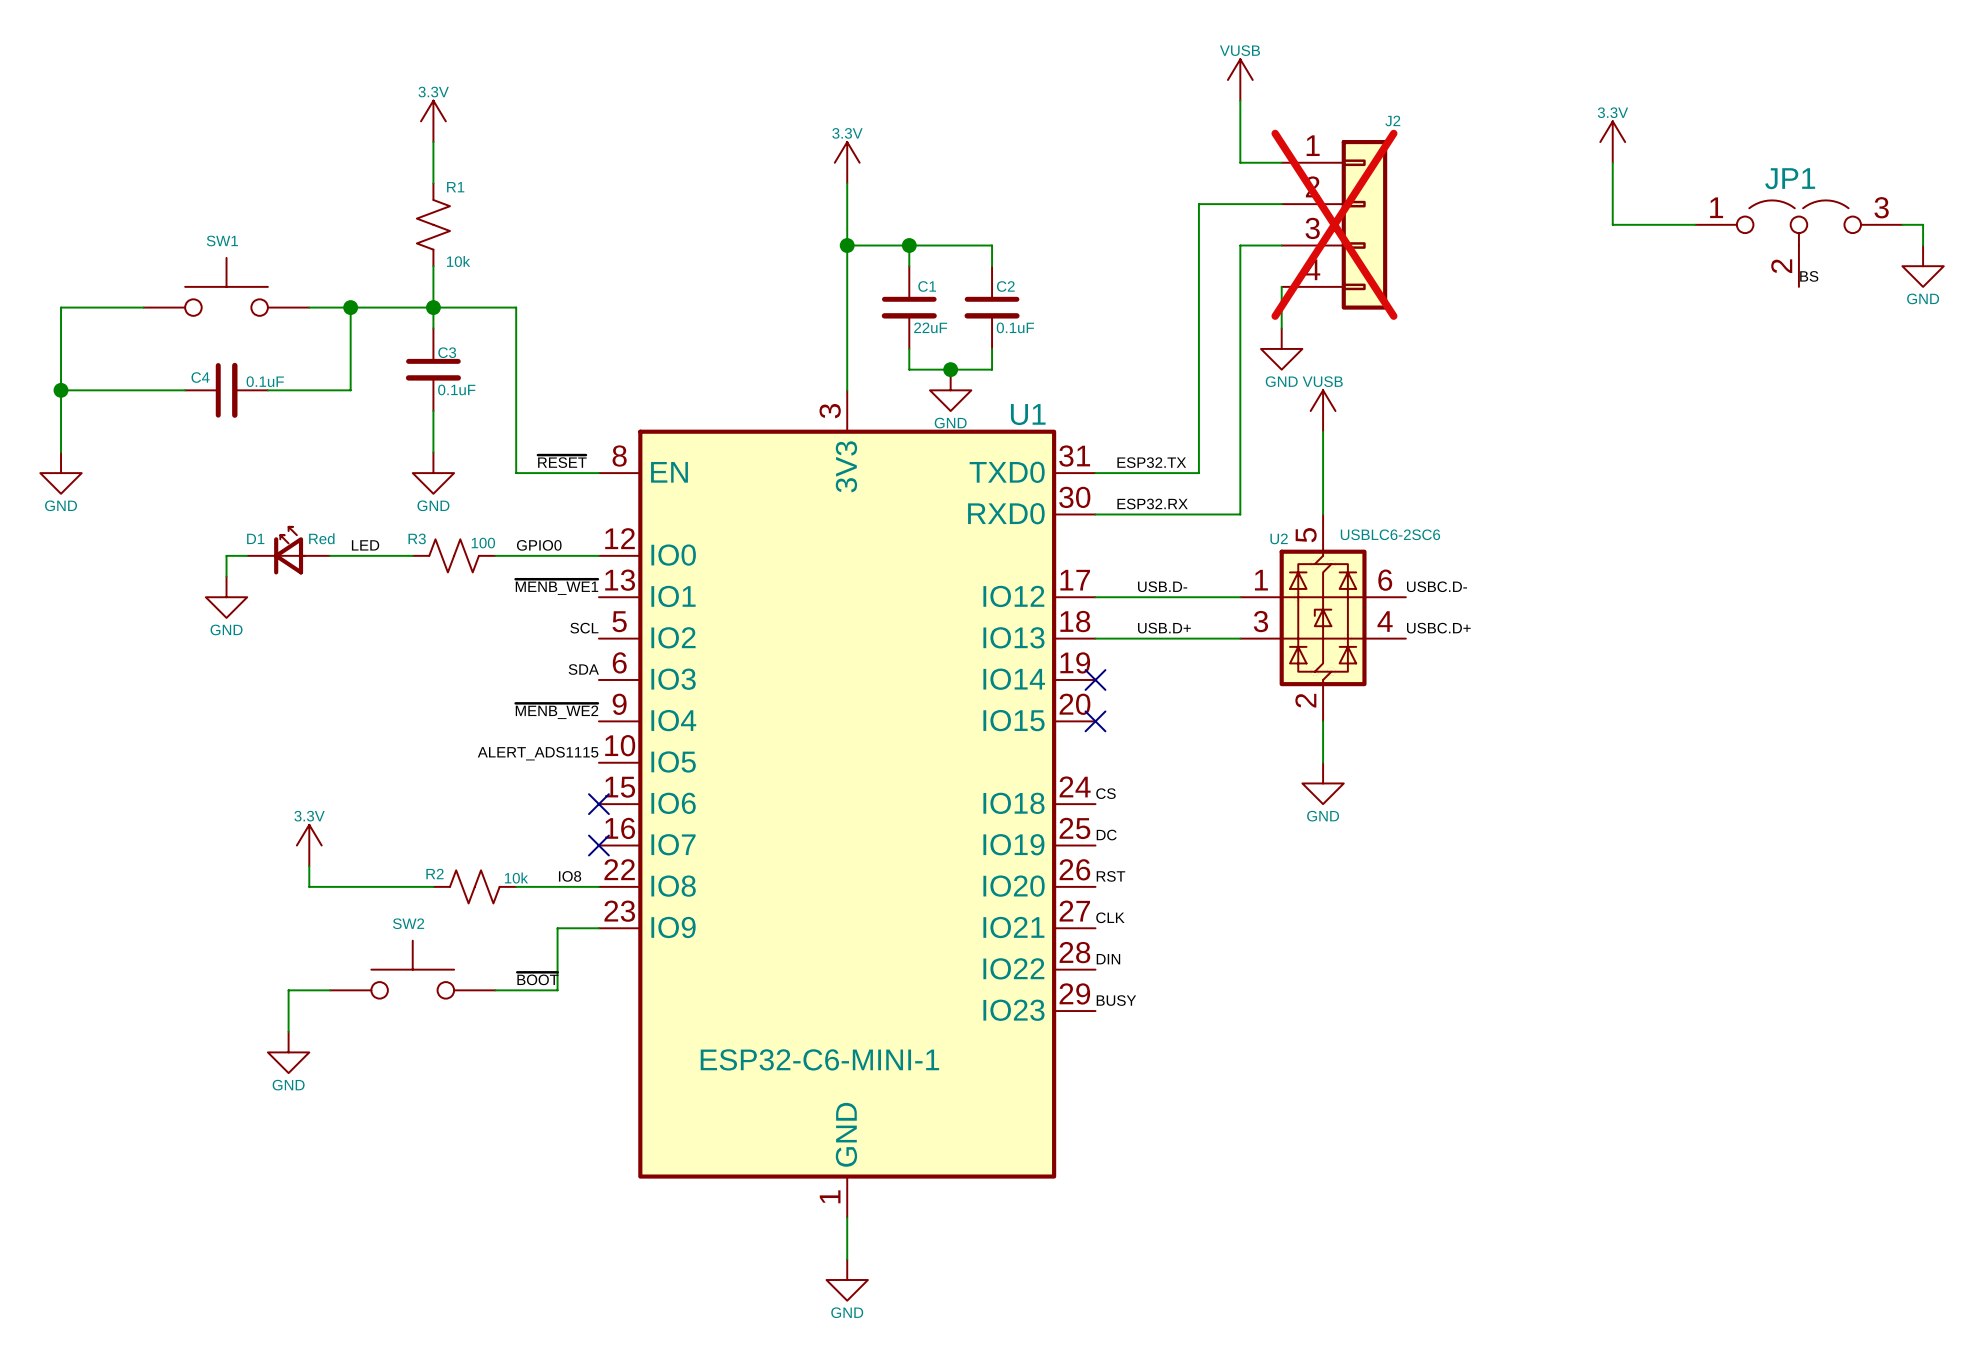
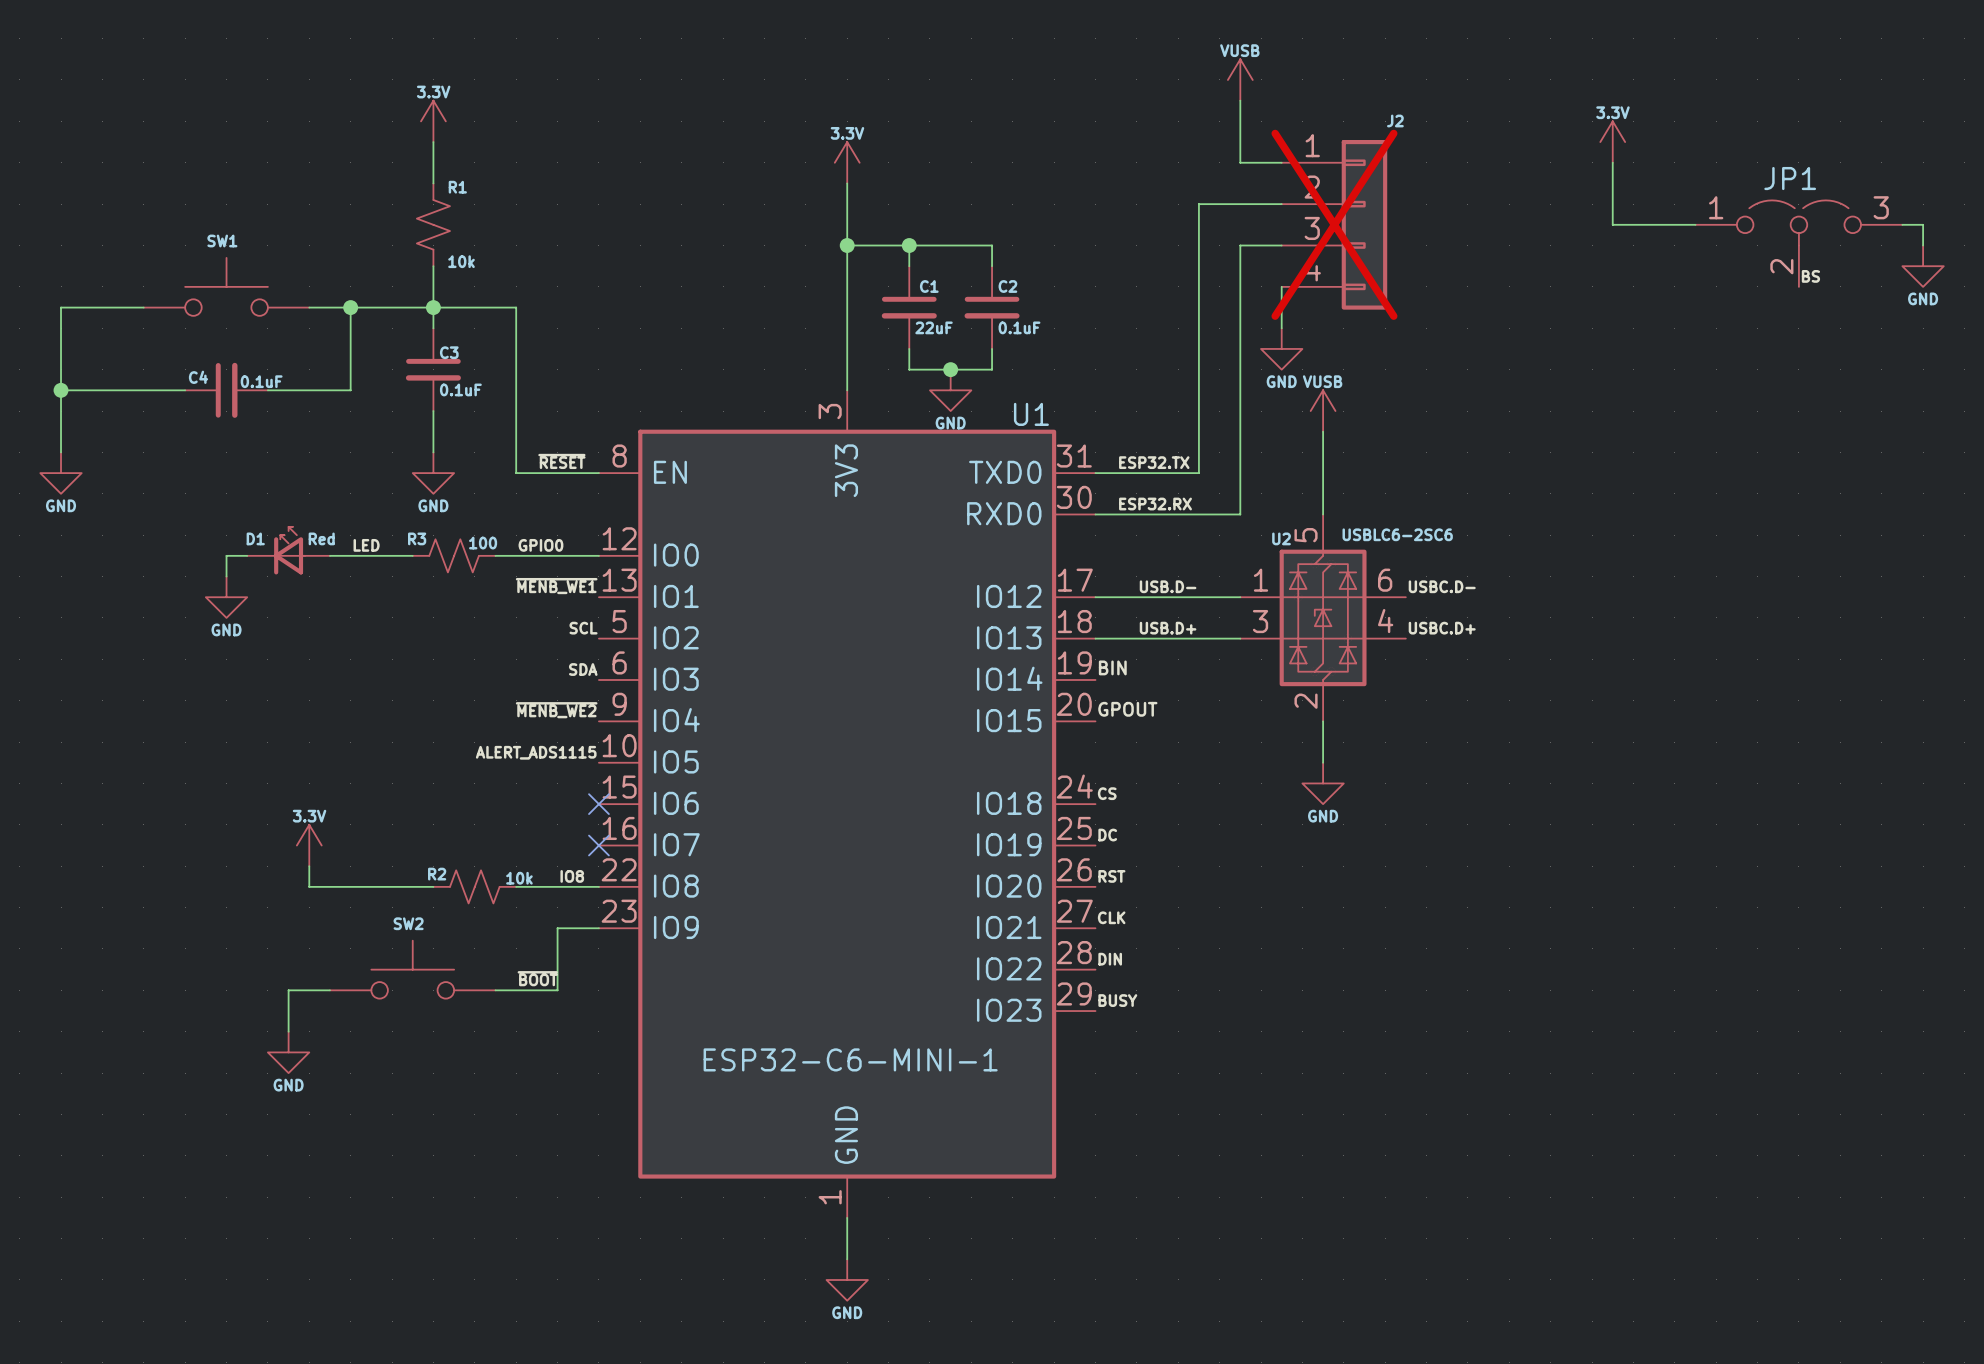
label: none -> BIN (1112, 667)
no-connect mark: (1095, 679) -> none
label: none -> GPOUT (1127, 709)
no-connect mark: (1095, 721) -> none

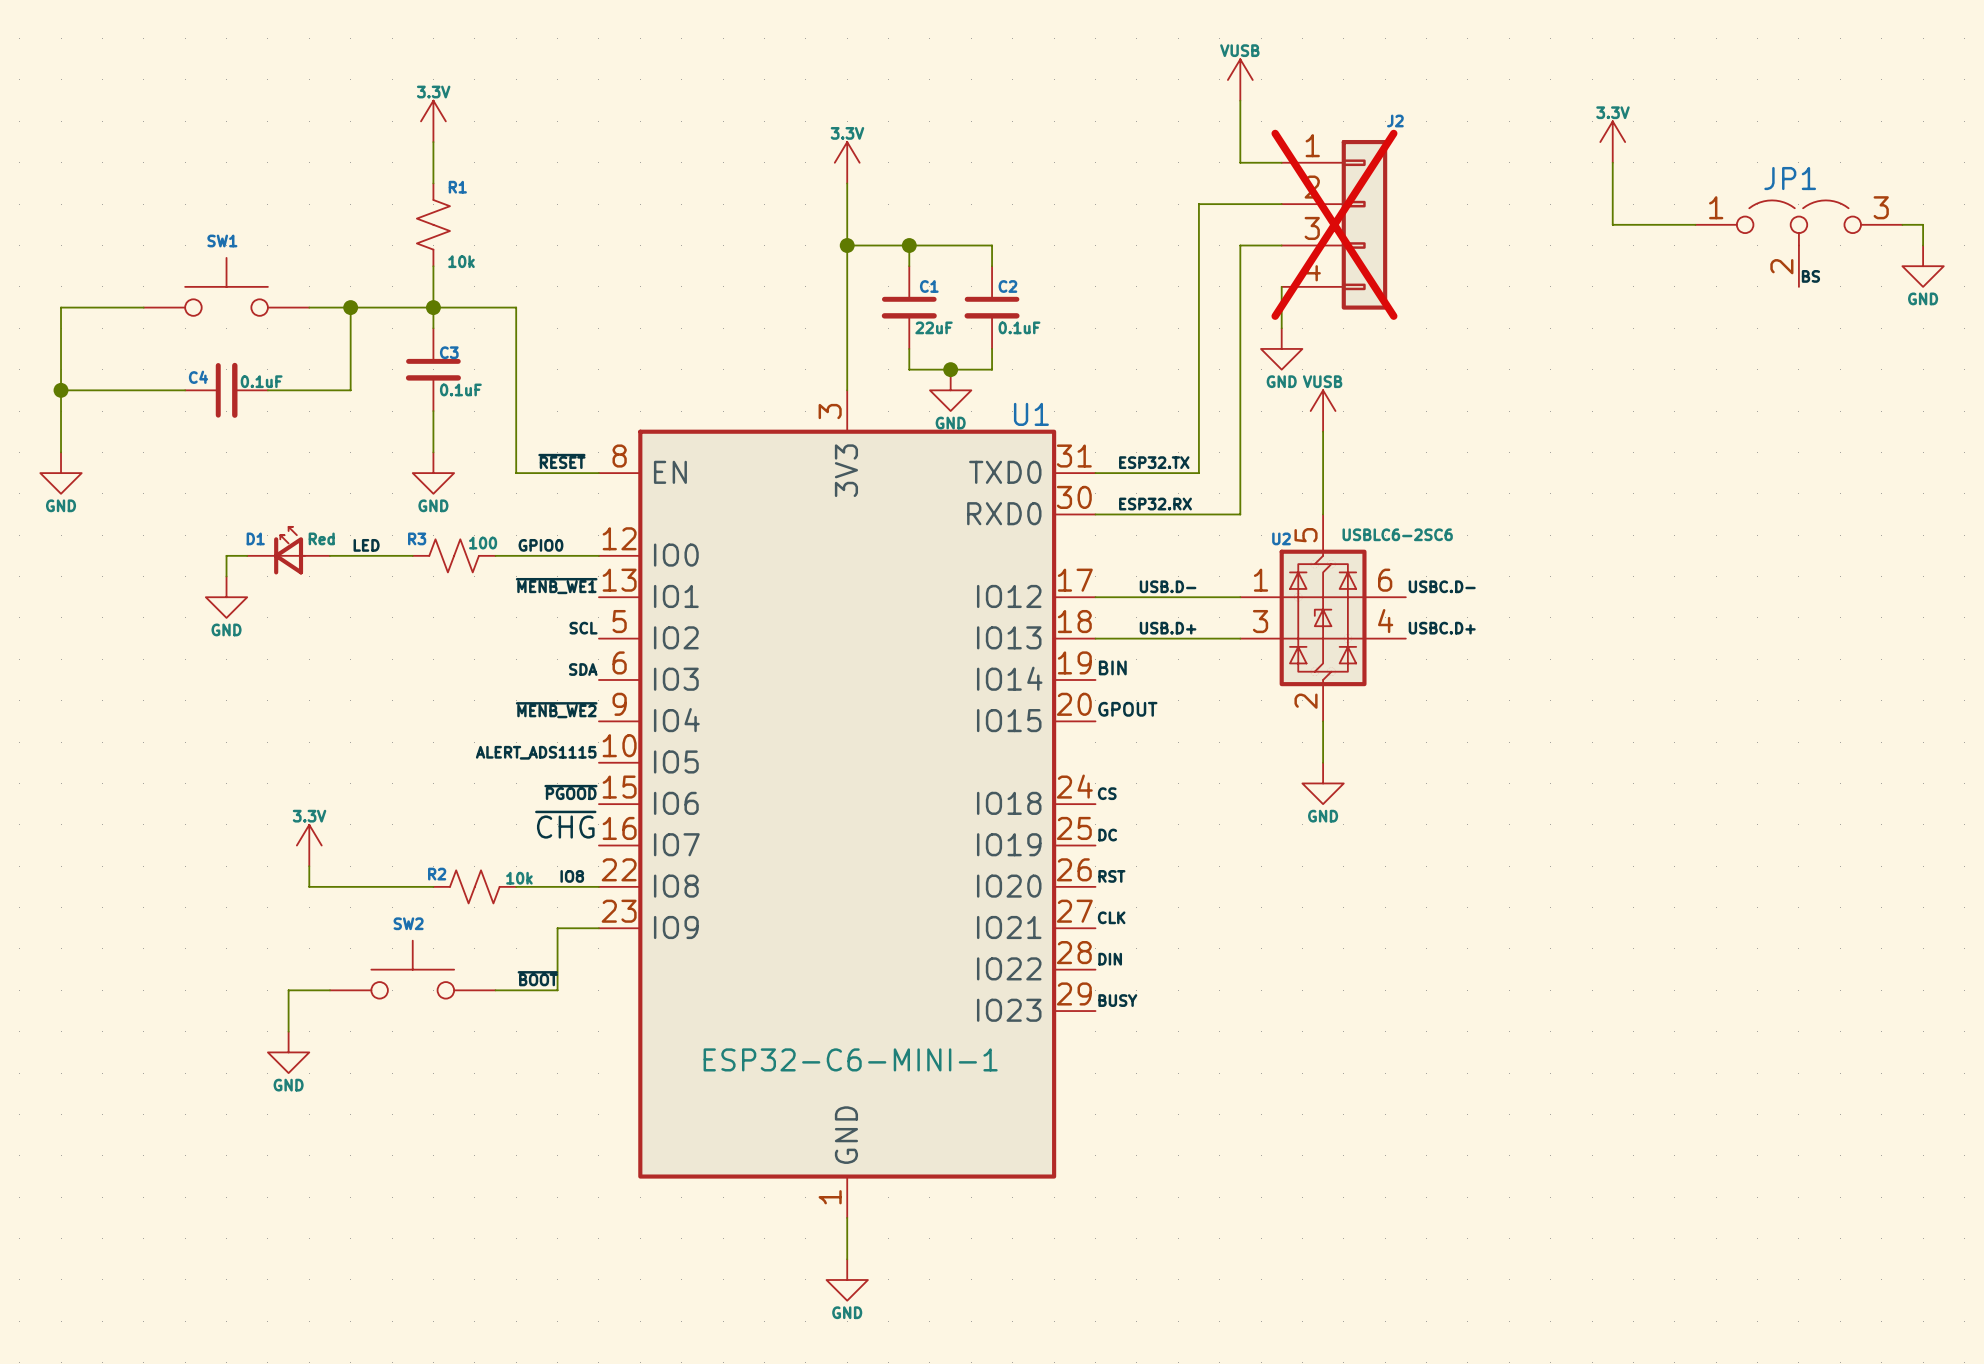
label: none -> ~{PGOOD} (570, 792)
no-connect mark: (598, 804) -> none
label: none -> ~{CHG} (565, 824)
no-connect mark: (598, 845) -> none

